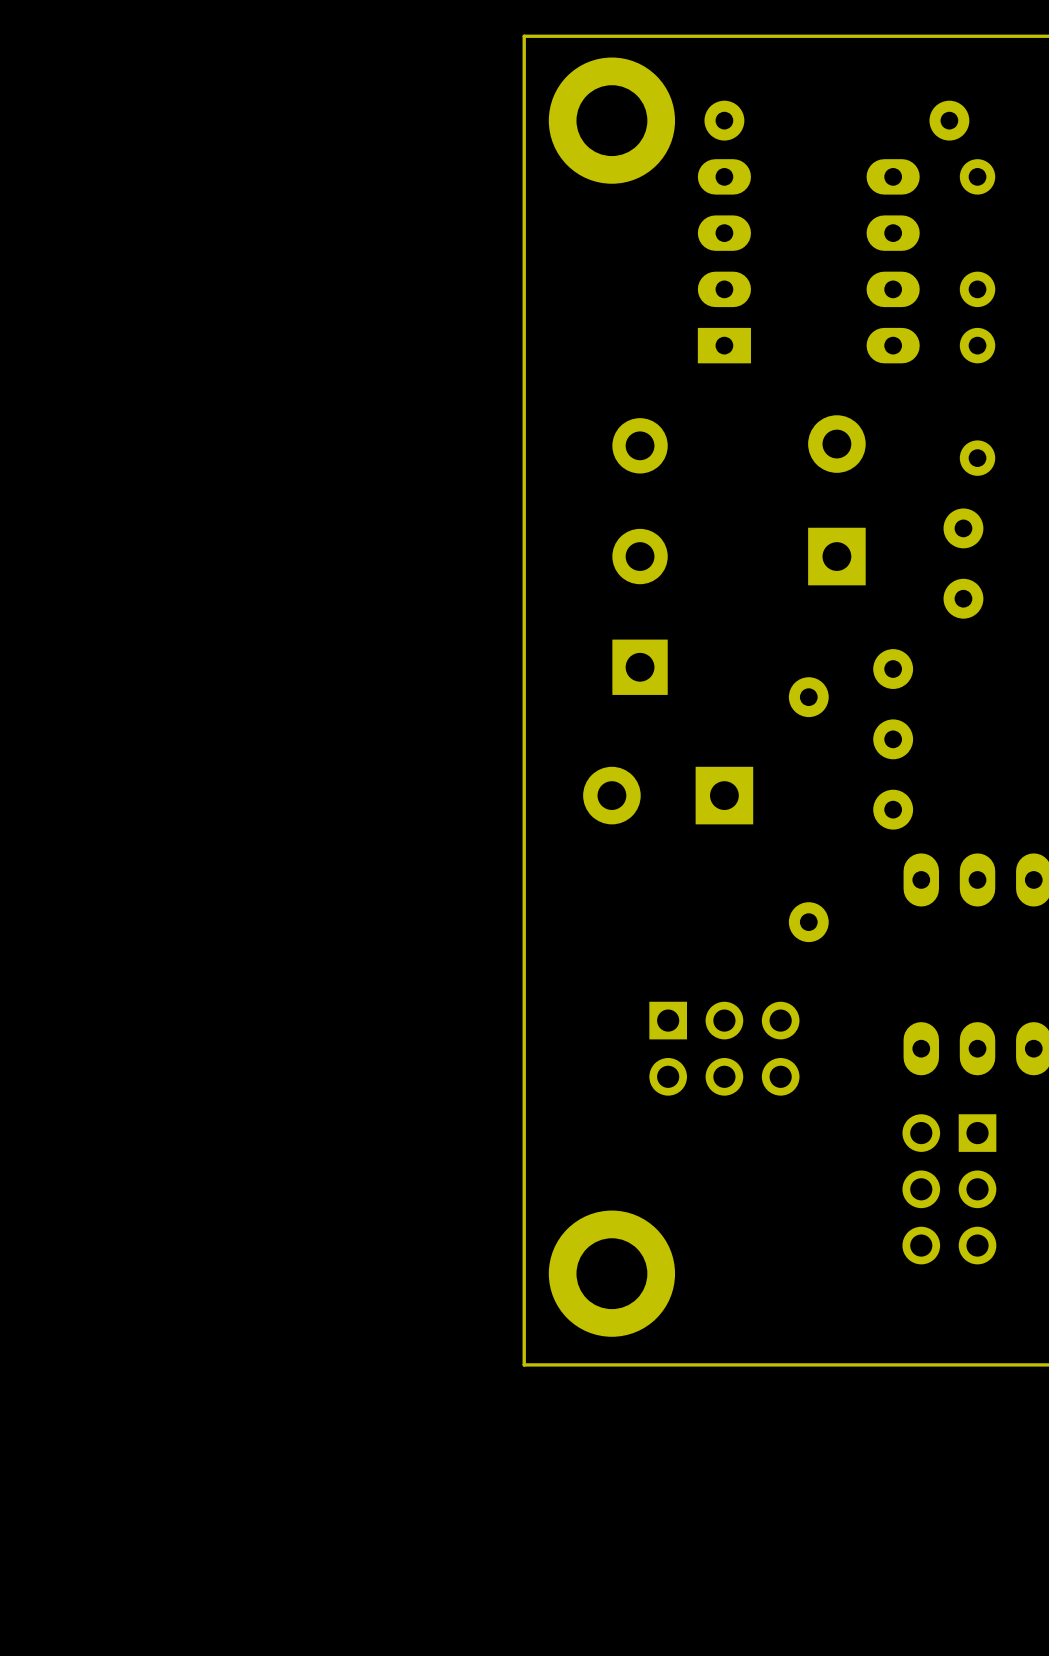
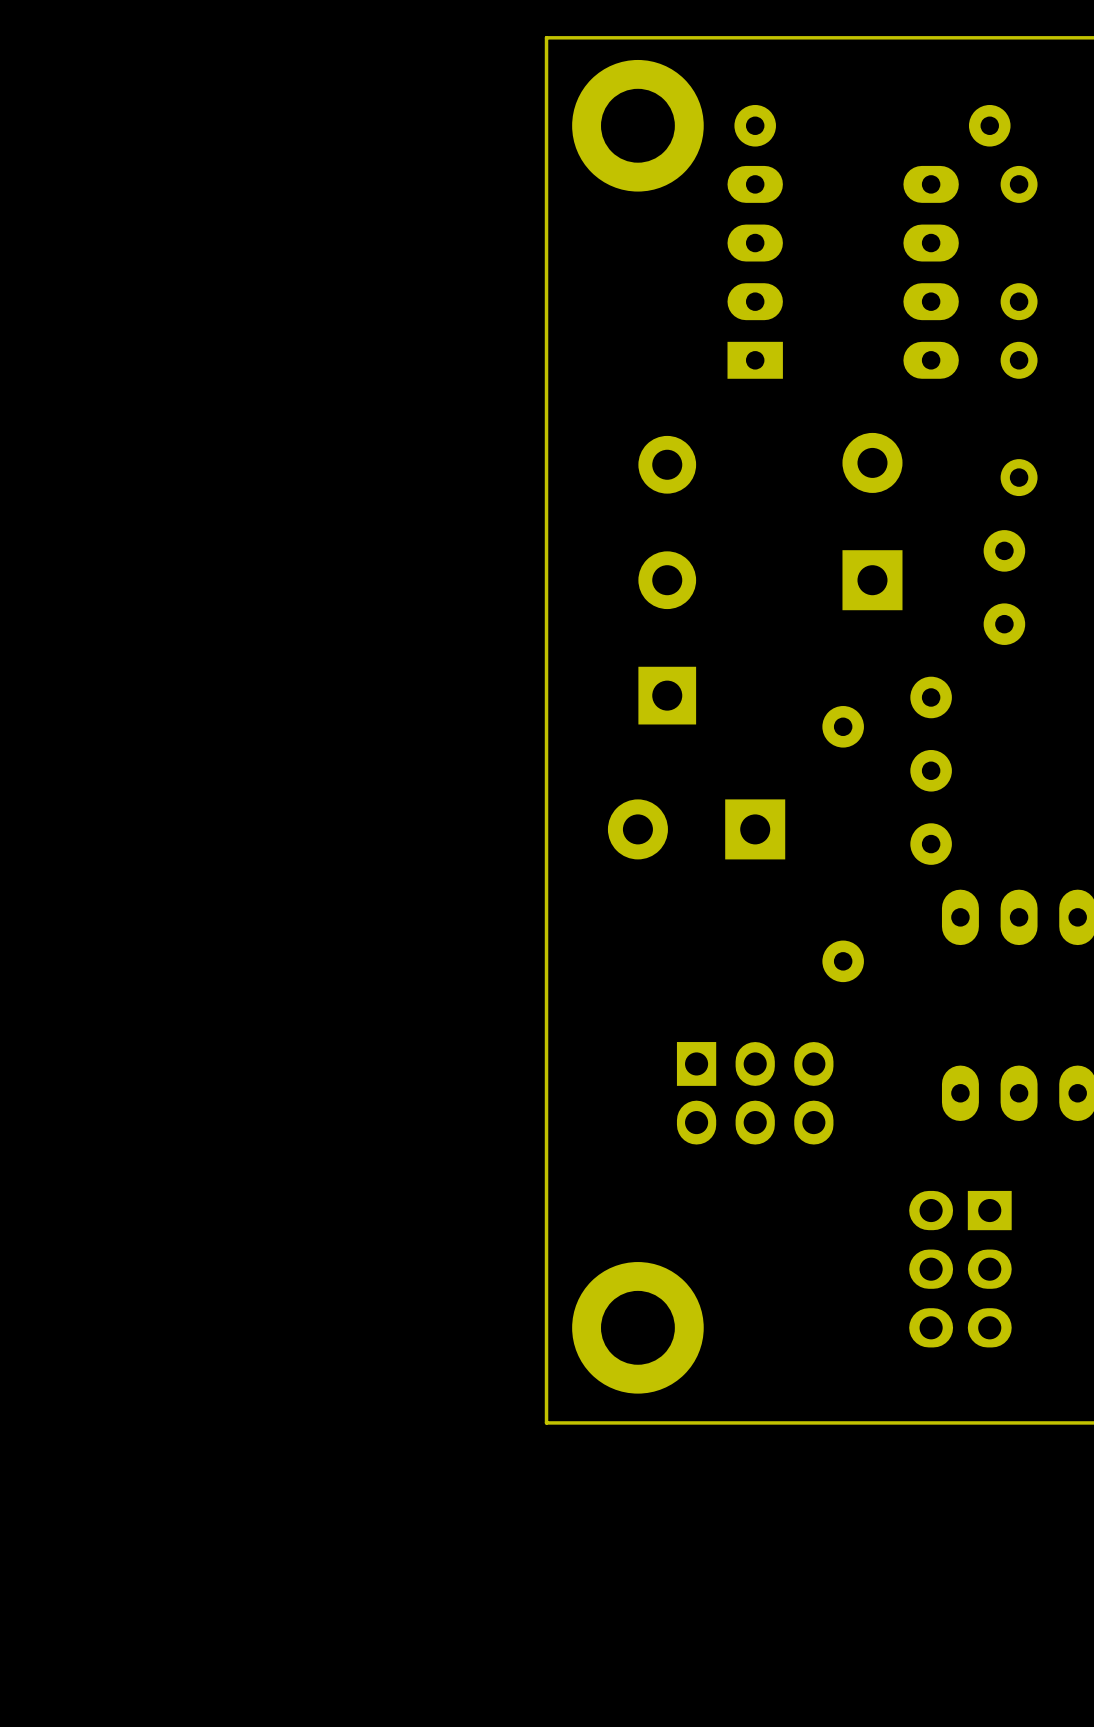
part footprint: [649, 1001, 800, 1096] -> [676, 1042, 834, 1145]
part: (949, 1189) -> none
part: none -> (960, 1269)

